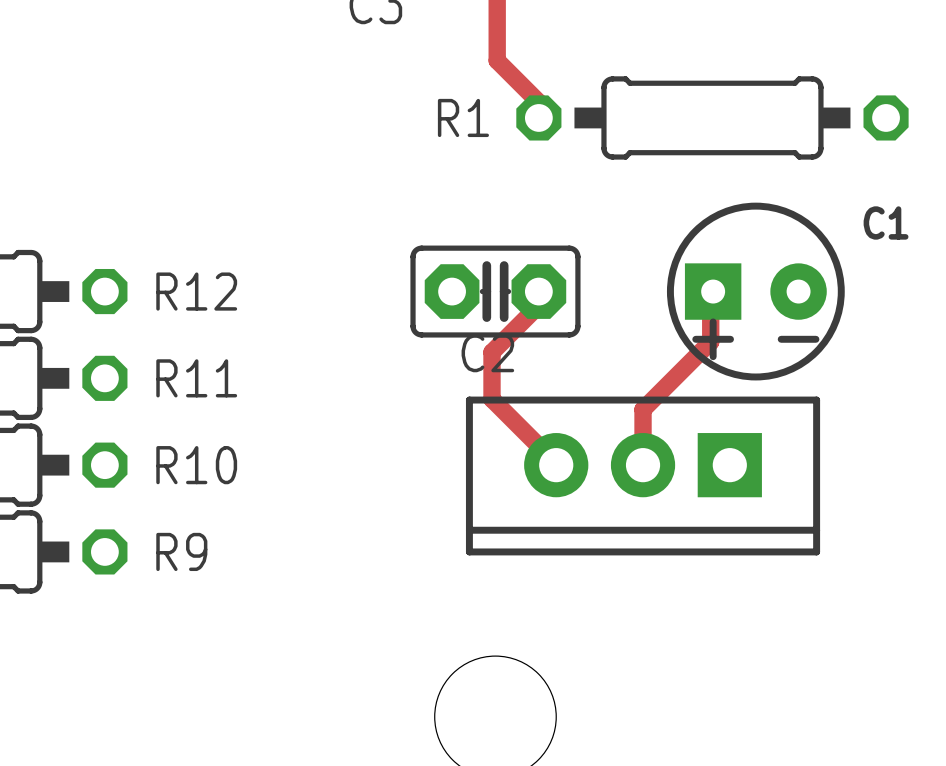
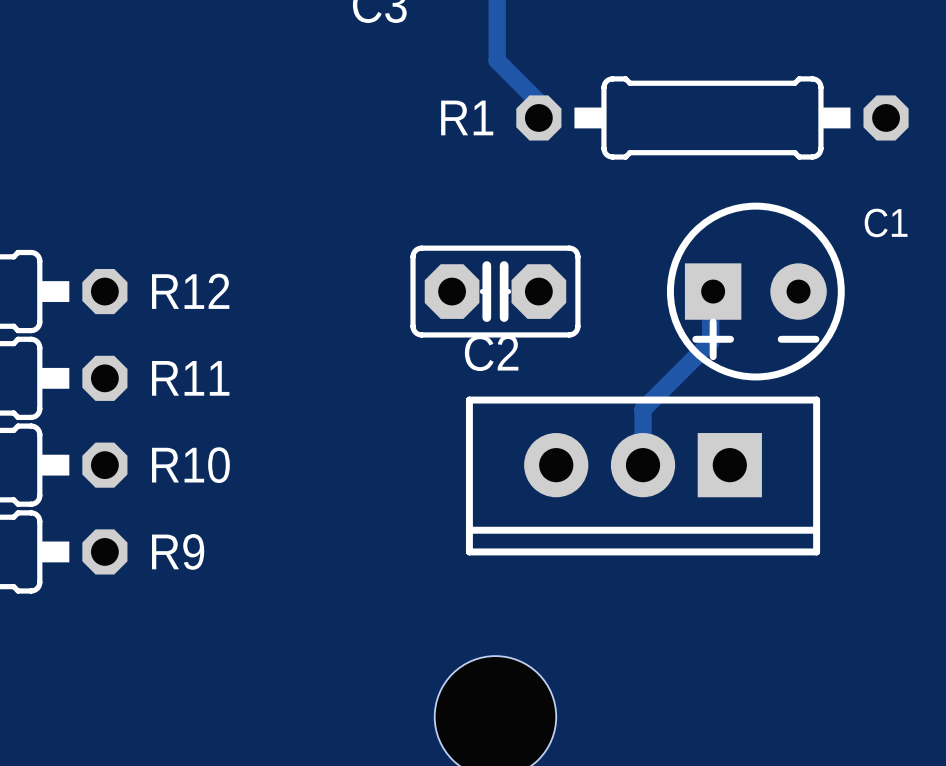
track: (538, 291) (538, 305) (492, 352) (492, 399) (556, 465) -> none

